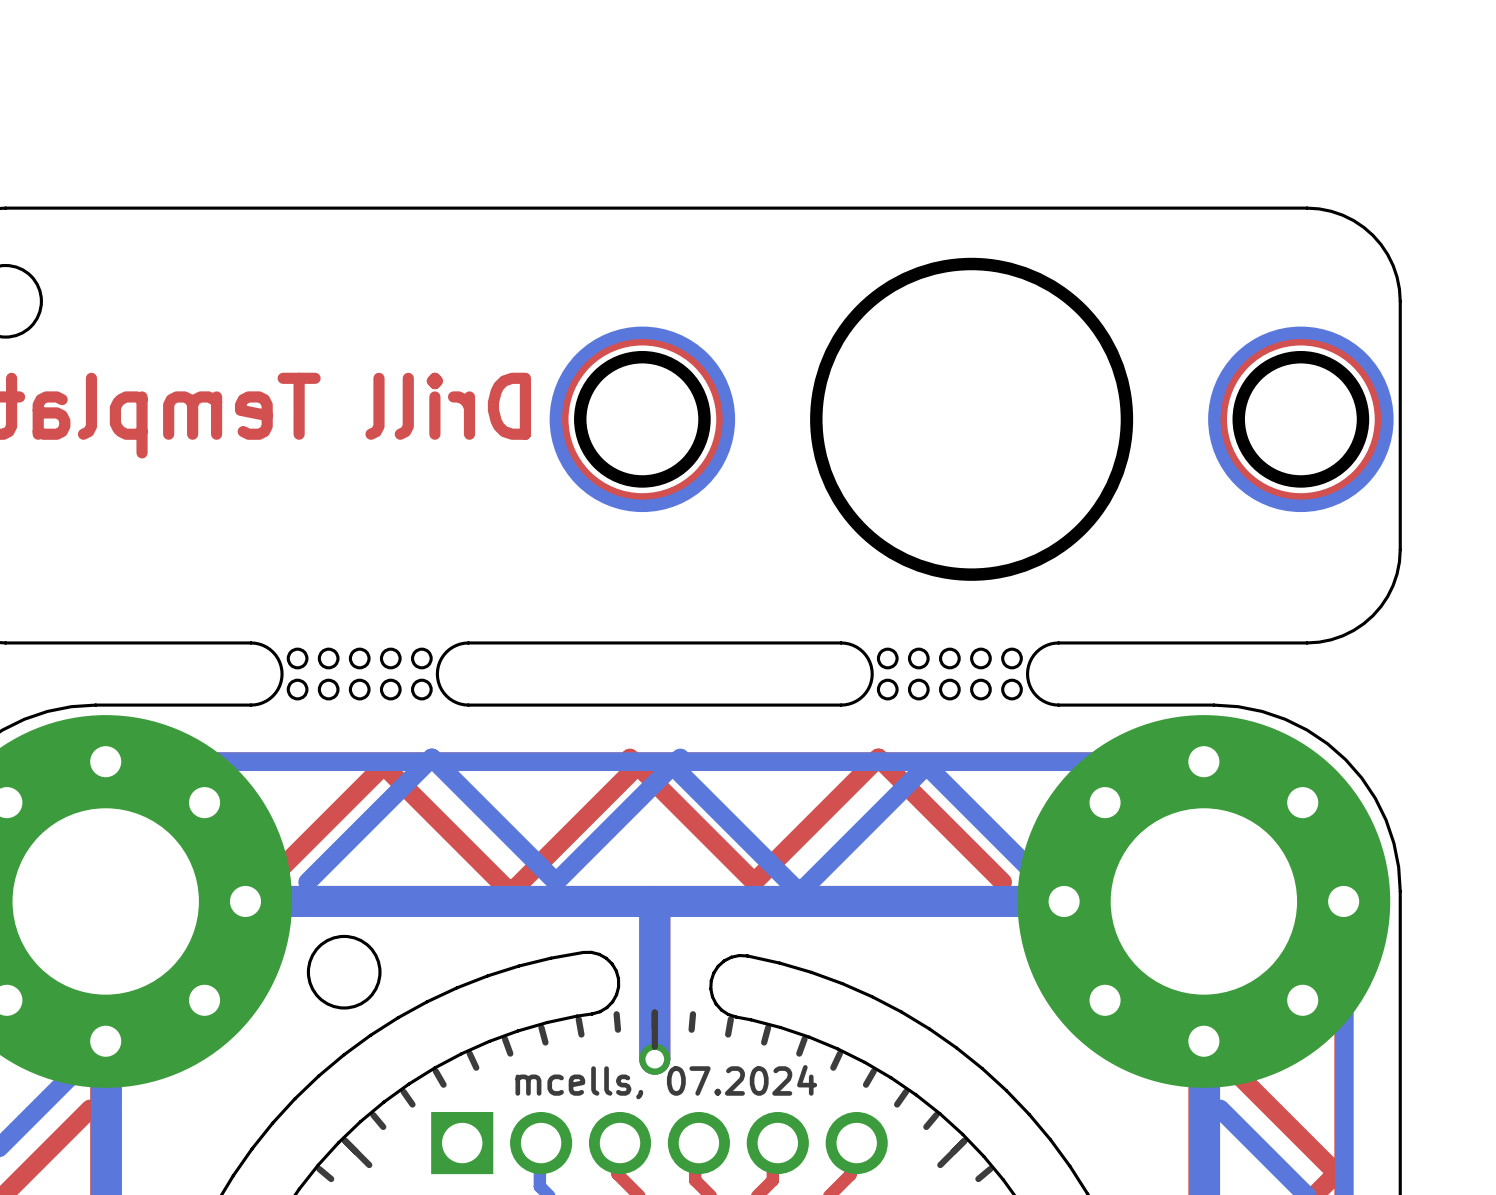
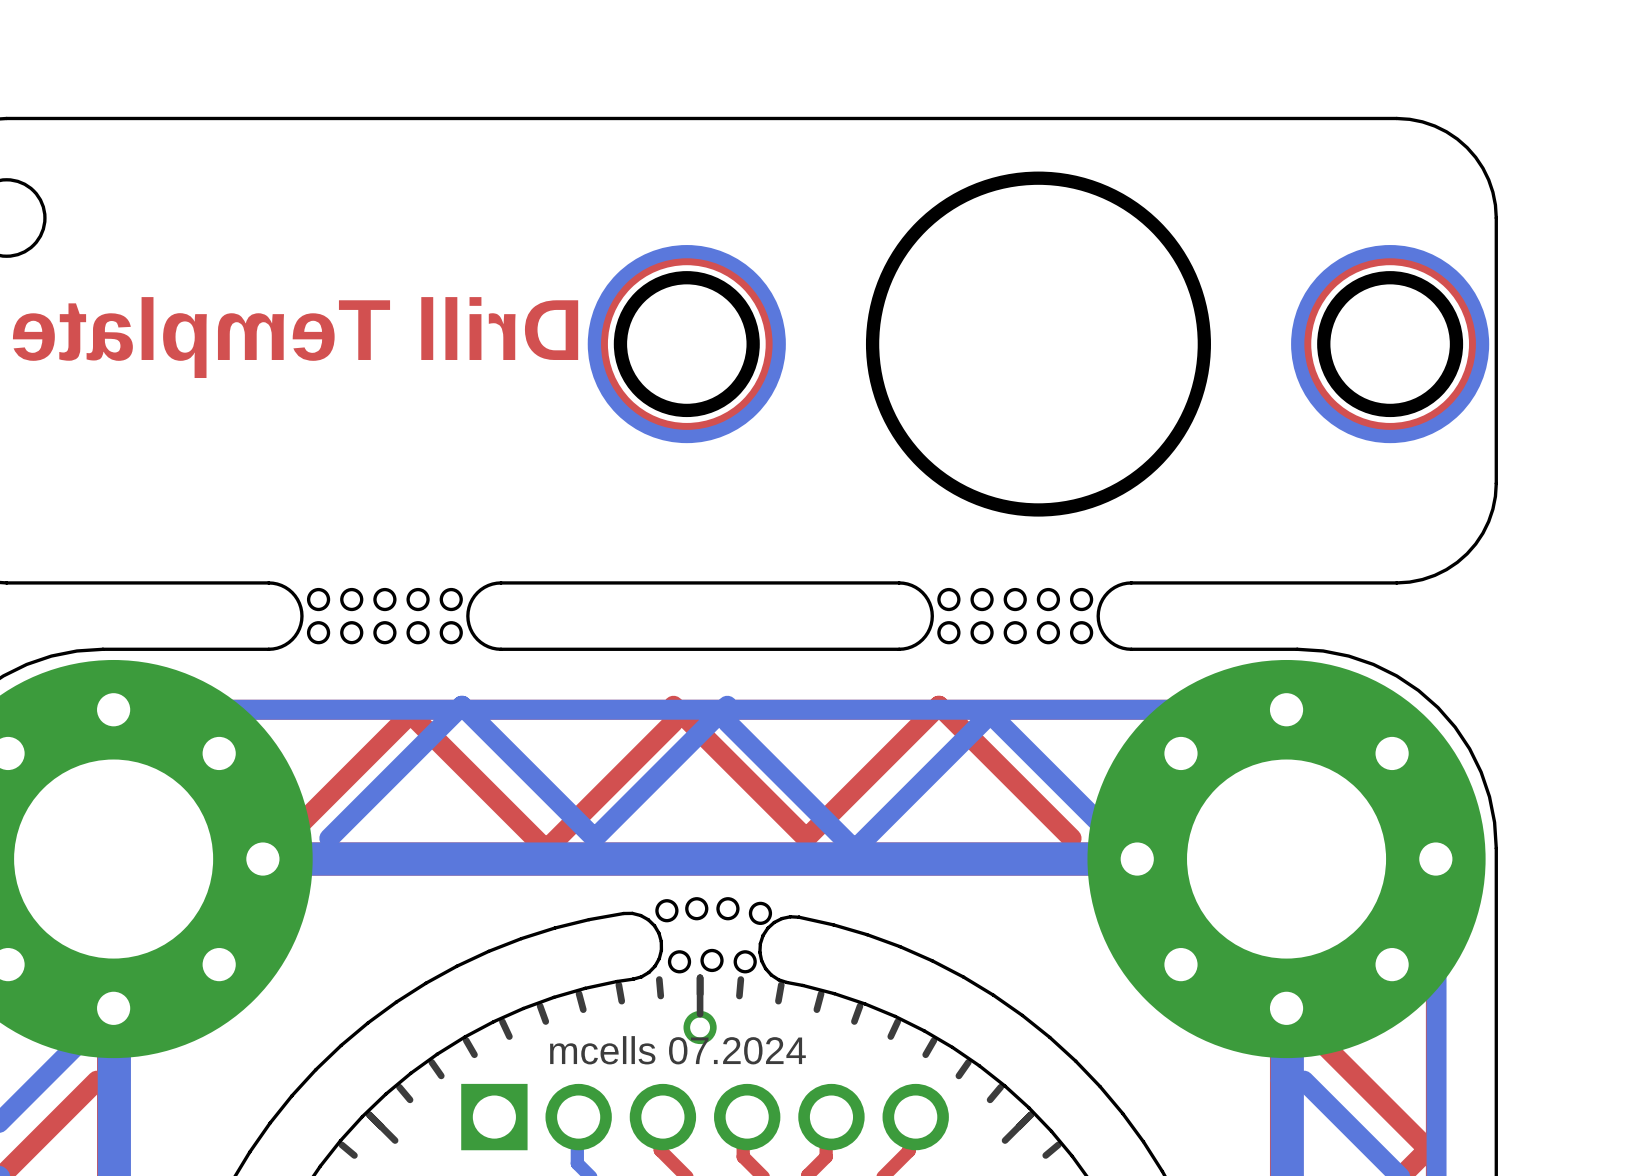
bottom track: (654, 901) (654, 1059) -> none
round board edge: [306, 934, 382, 1010] -> none
round board edge: none -> [685, 897, 709, 921]
round board edge: none -> [716, 897, 740, 921]
round board edge: none -> [655, 899, 679, 923]
round board edge: none -> [748, 901, 773, 925]
round board edge: none -> [700, 948, 724, 973]
round board edge: none -> [667, 950, 692, 974]
round board edge: none -> [733, 950, 757, 974]
text: mcells, 07.2024 (666, 1082) -> mcells 07.2024 (677, 1050)

